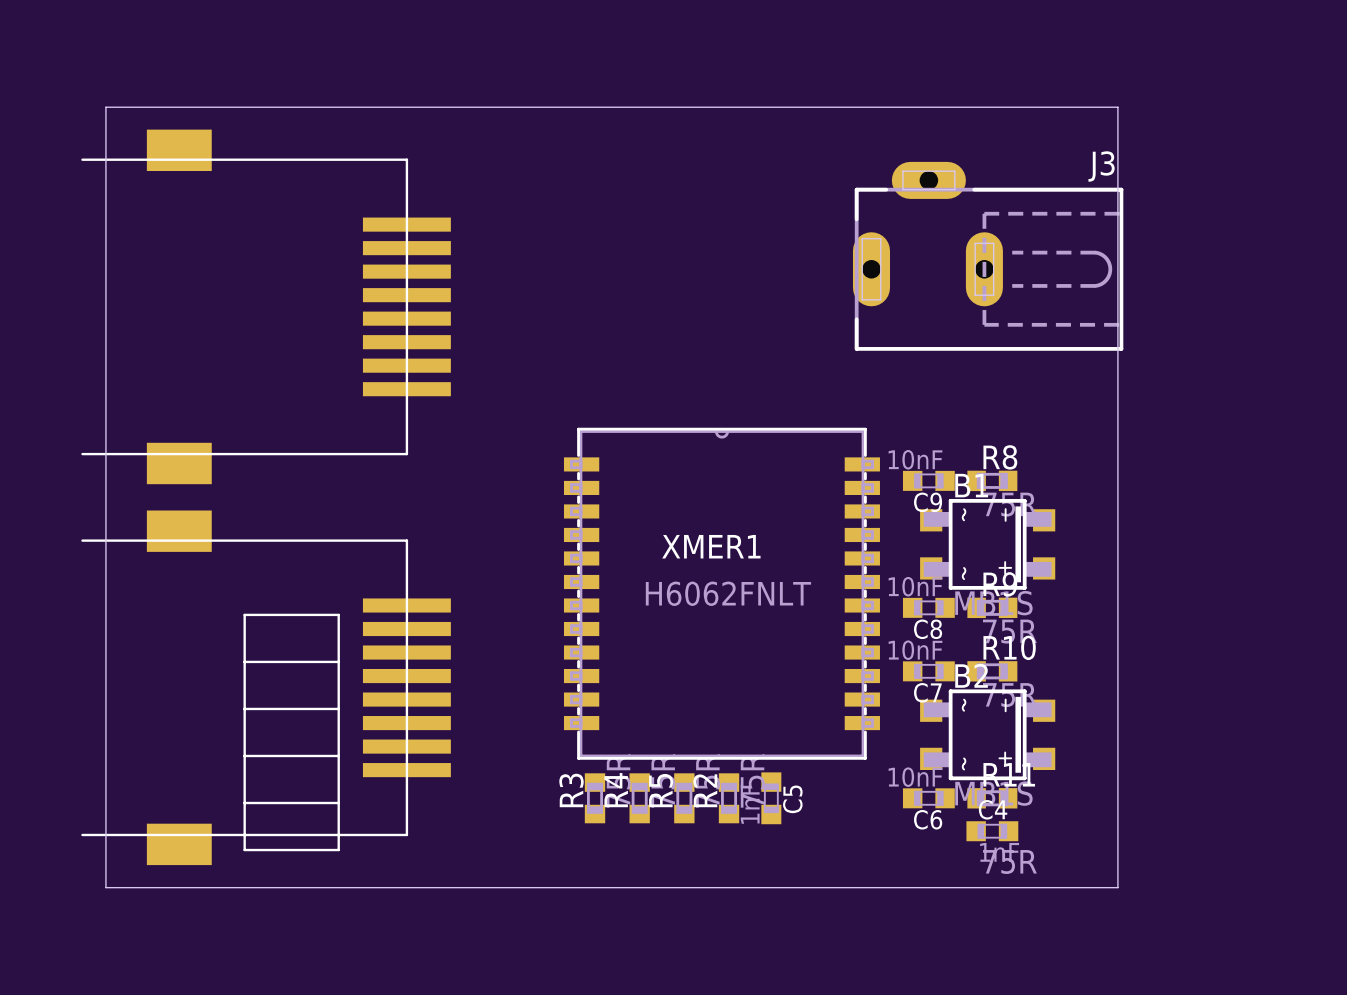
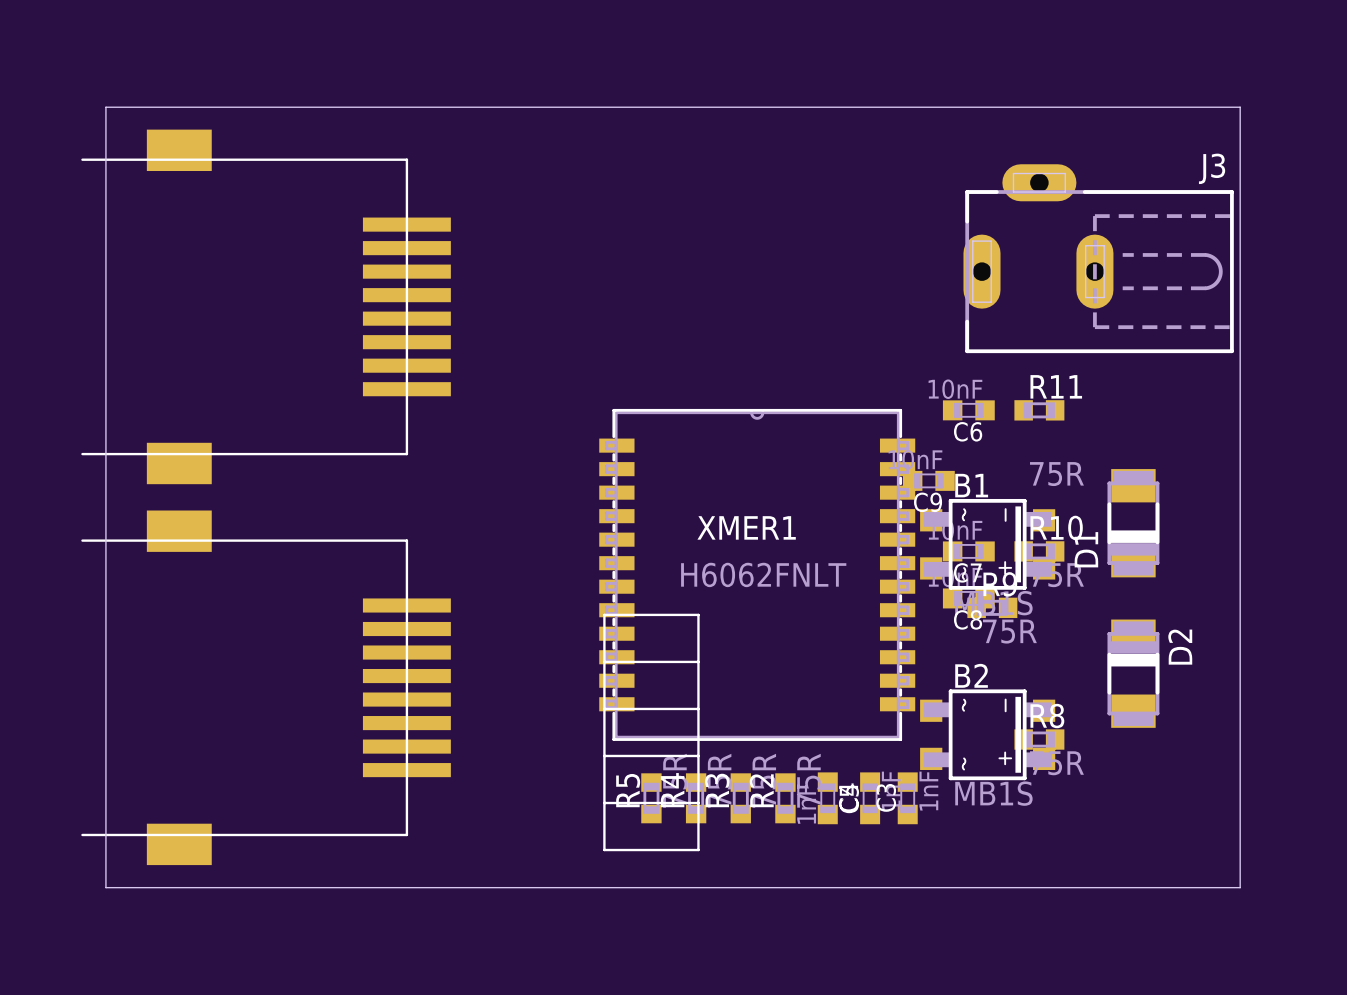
board edge: (1117, 107) (1117, 887) -> (1117, 107) (1240, 107) (1240, 887) (1117, 887)
J3 position: (988, 256) -> (1098, 258)
R8 position: (992, 480) -> (1039, 739)
D1: none -> (1133, 523)
XMER1 position: (721, 593) -> (757, 574)
C8 position: (928, 607) -> (968, 598)
C7 position: (928, 671) -> (968, 551)
R10 position: (992, 671) -> (1039, 551)
D2: none -> (1133, 673)
part position: (291, 732) -> (651, 732)
R3 position: (595, 798) -> (740, 798)
R4 position: (639, 798) -> (696, 798)
R5 position: (684, 798) -> (651, 798)
R2 position: (729, 798) -> (785, 798)
C5 position: (771, 798) -> (827, 798)
C3: none -> 1nF (907, 798)
C6 position: (928, 798) -> (968, 410)
R11 position: (992, 798) -> (1039, 410)
C4 rotation: 0° (992, 831) -> 90° clockwise (870, 798)
C4 position: (992, 831) -> (870, 798)

